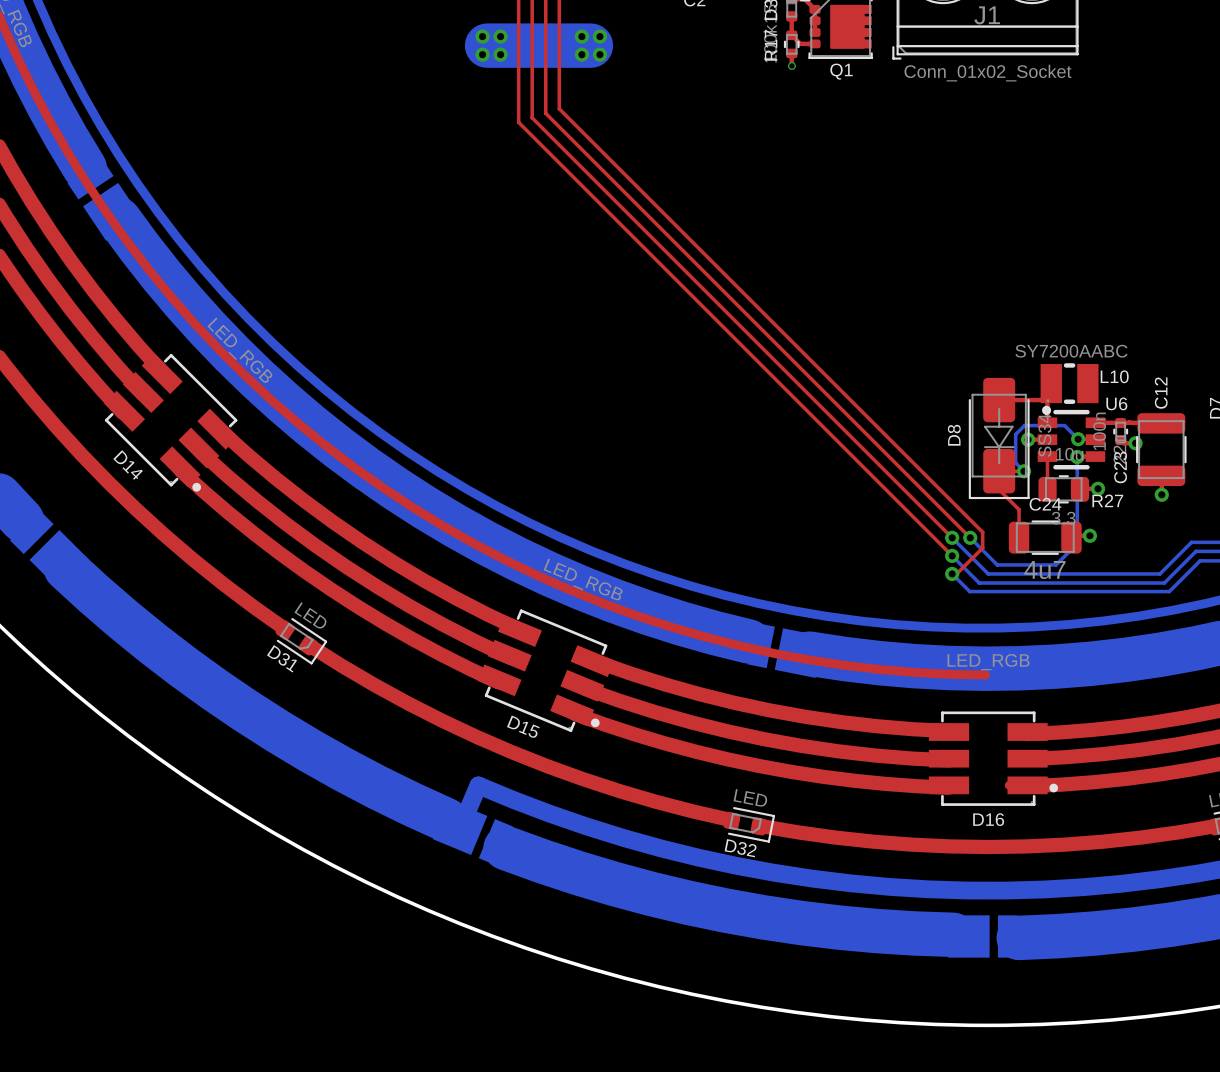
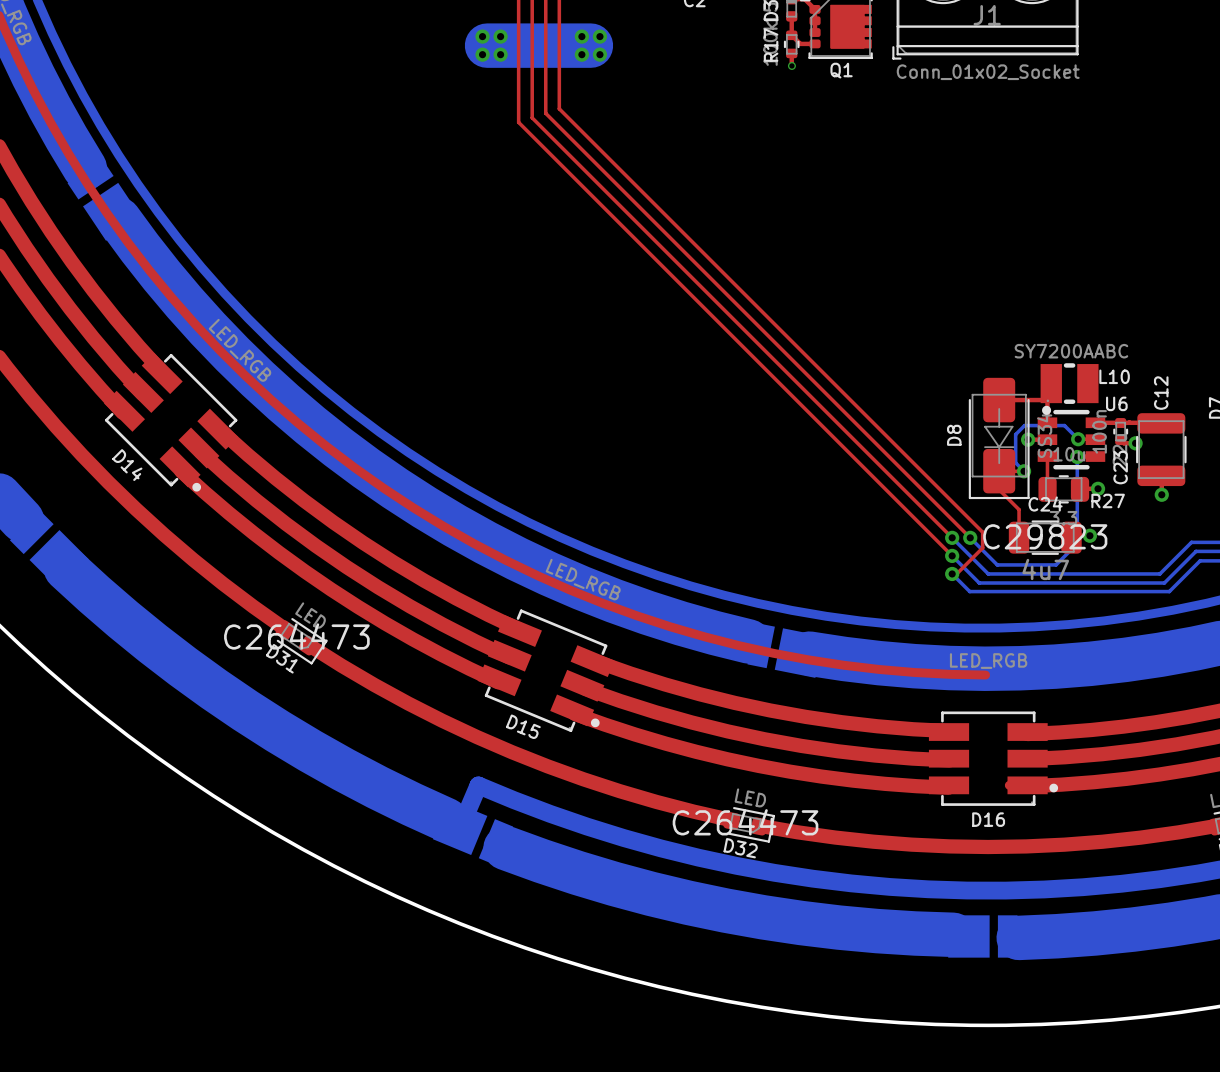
C24 text: none -> C29823 (1045, 536)
D31 text: none -> C264473 (296, 636)
D32 text: none -> C264473 (745, 822)

